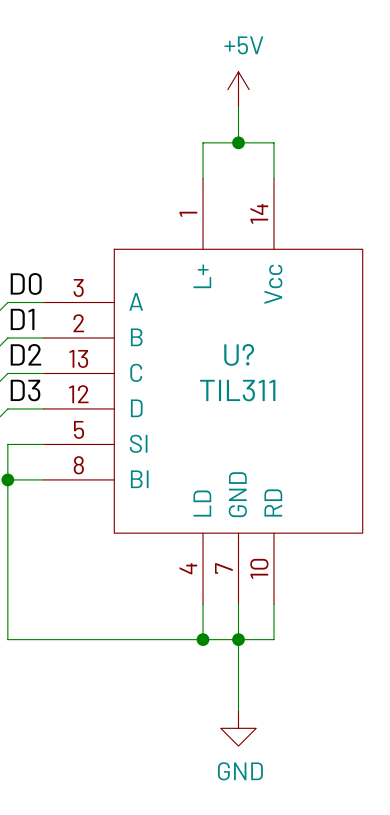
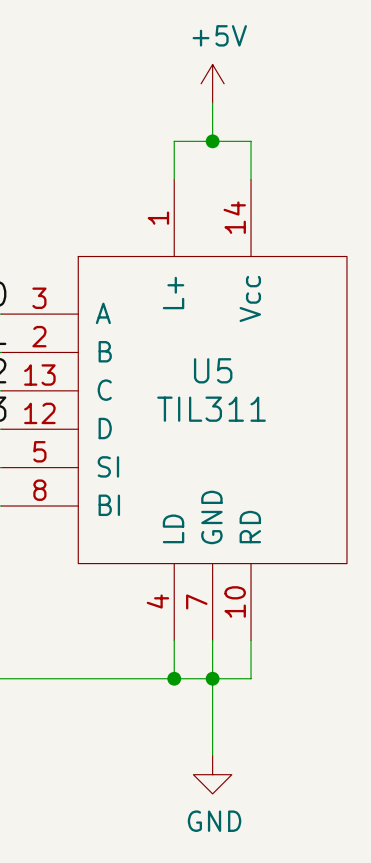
U? name: U? (239, 354) -> U5 (213, 370)

